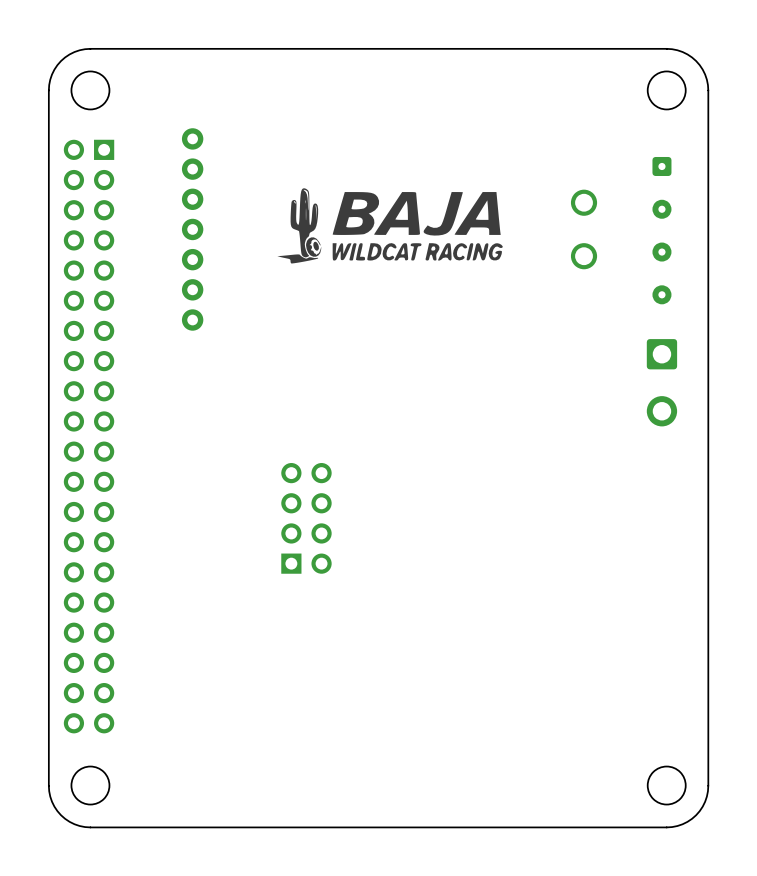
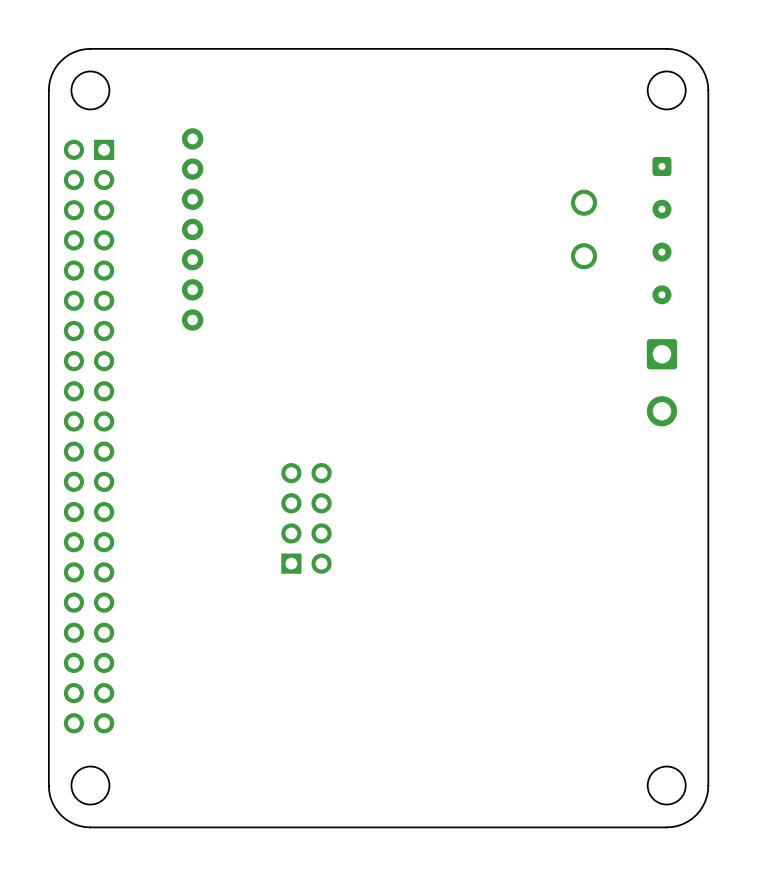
drawing: [277, 188, 503, 264] -> none

